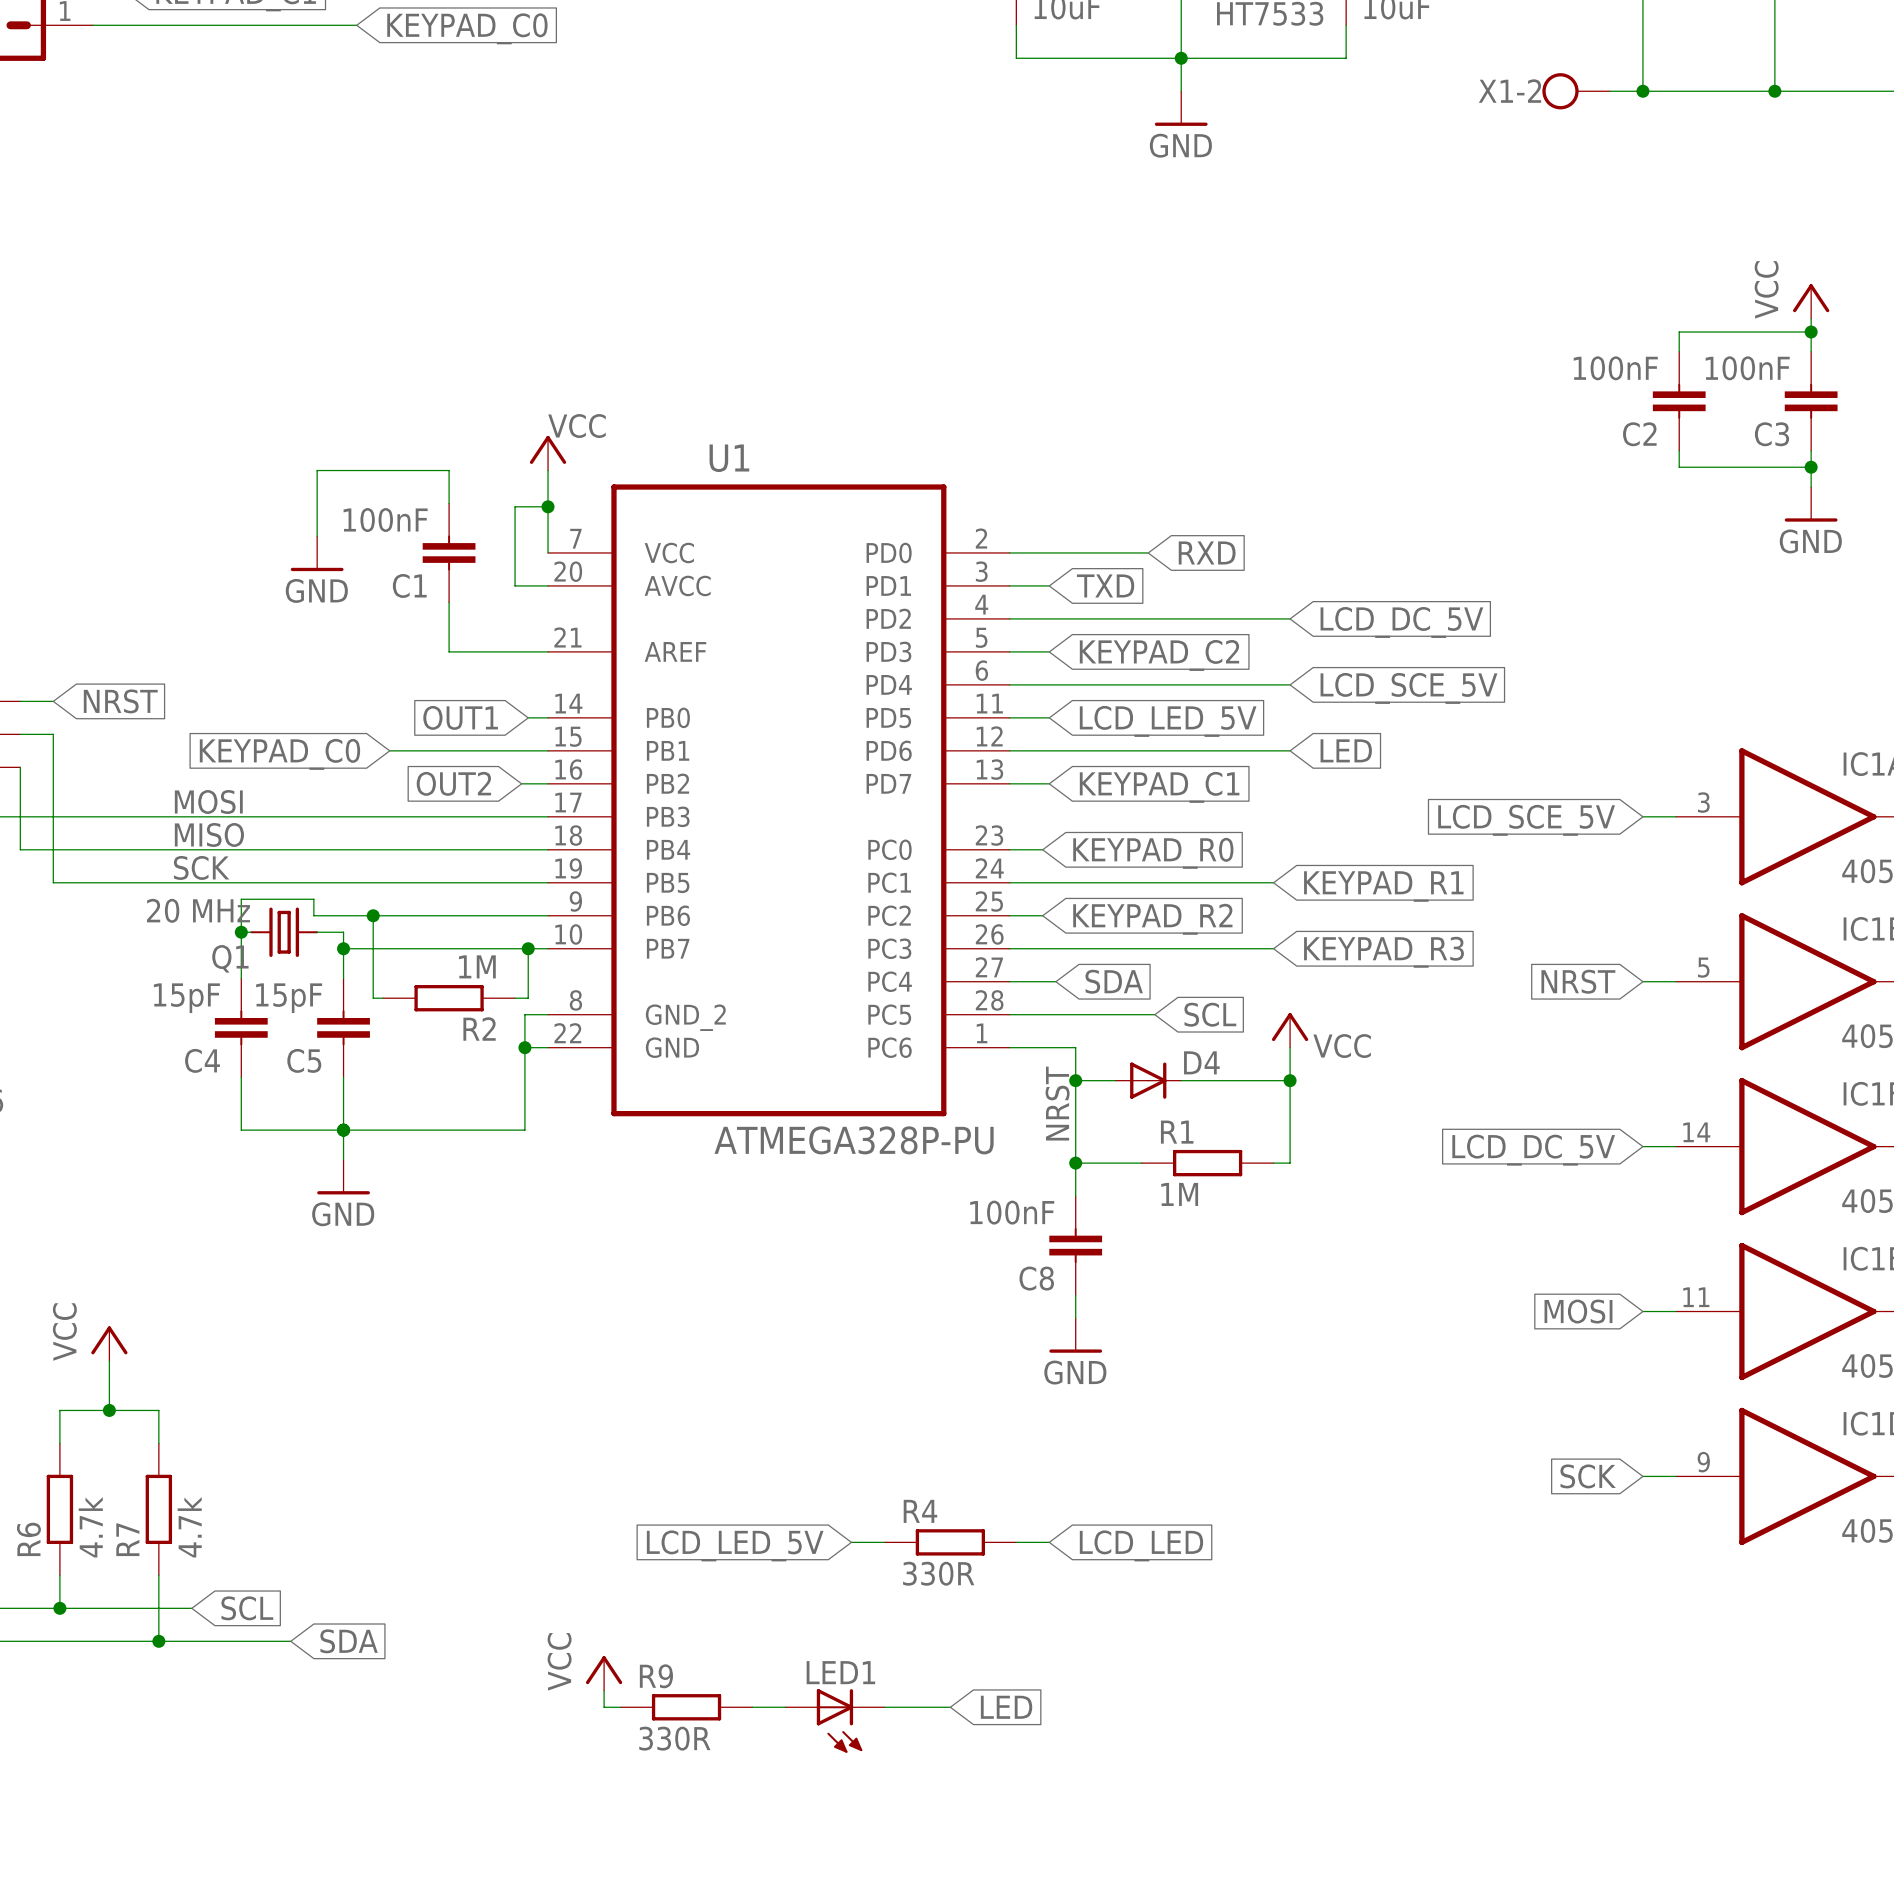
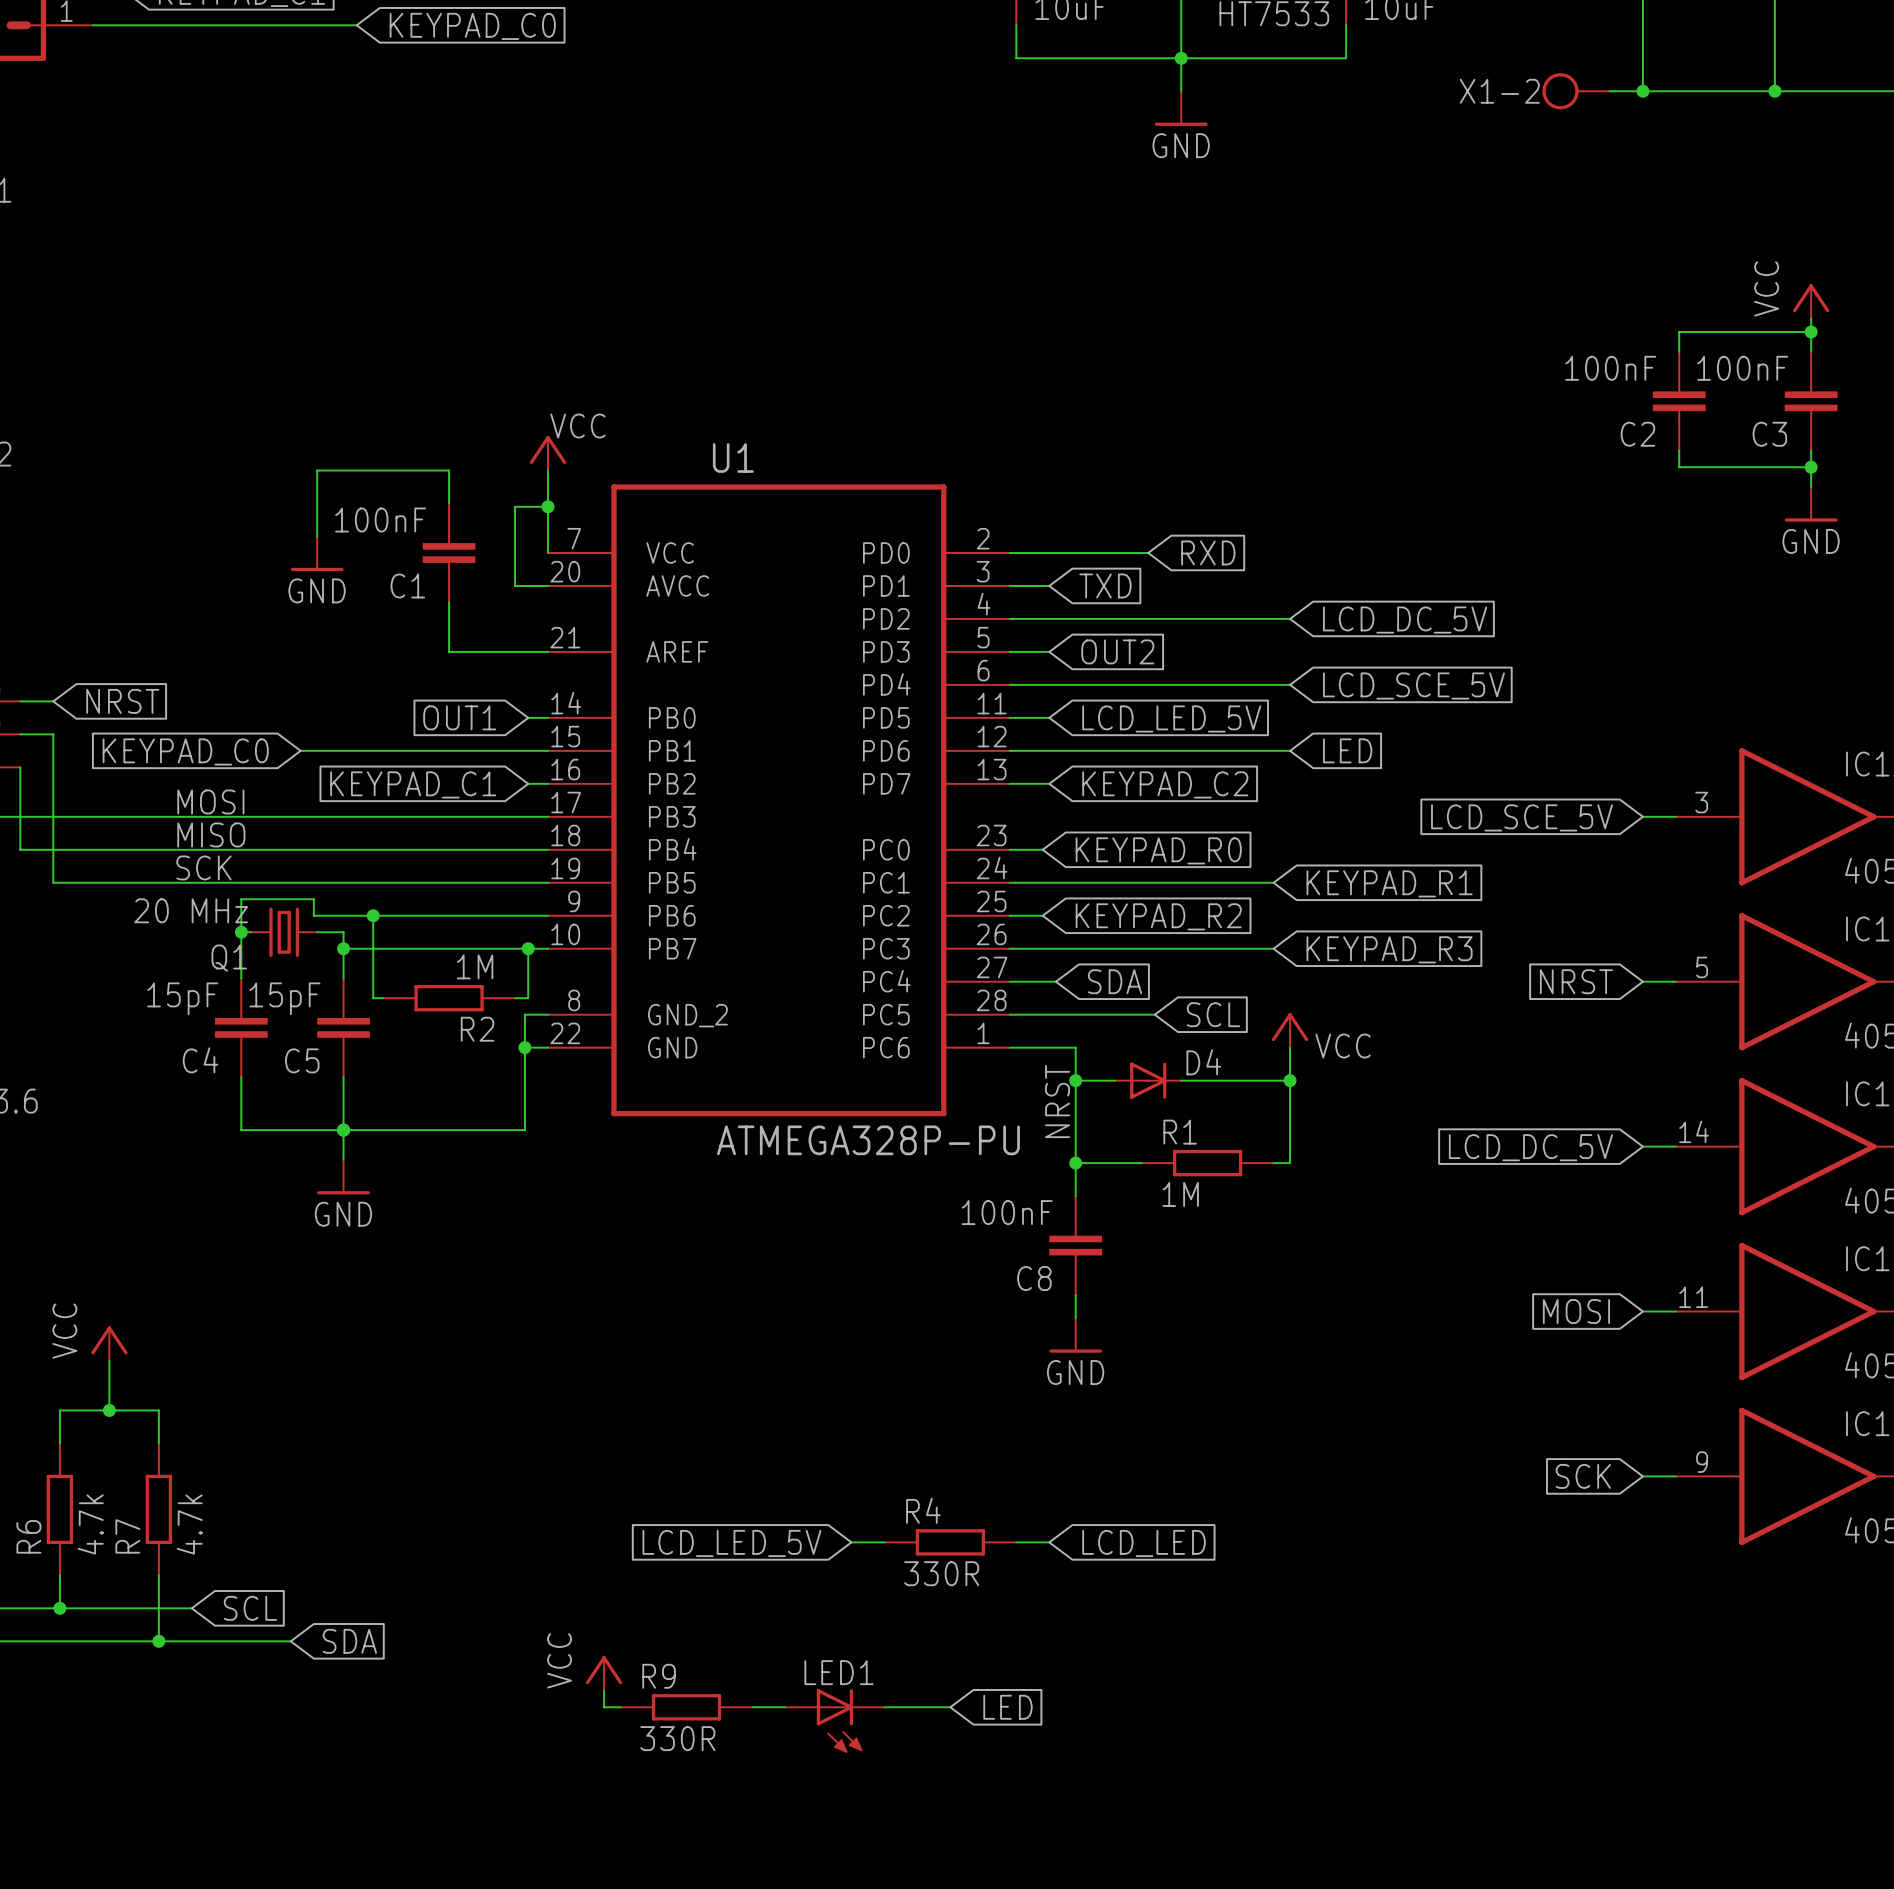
global label: KEYPAD_C2 (1159, 655) -> OUT2 (1117, 651)
wire: none -> (300, 750) (389, 750)
global label position: KEYPAD_C0 (279, 754) -> KEYPAD_C0 (185, 751)
global label: OUT2 (453, 783) -> KEYPAD_C1 (413, 784)
wire: (521, 783) (528, 783) -> none
global label: KEYPAD_C1 (1159, 787) -> KEYPAD_C2 (1165, 784)

